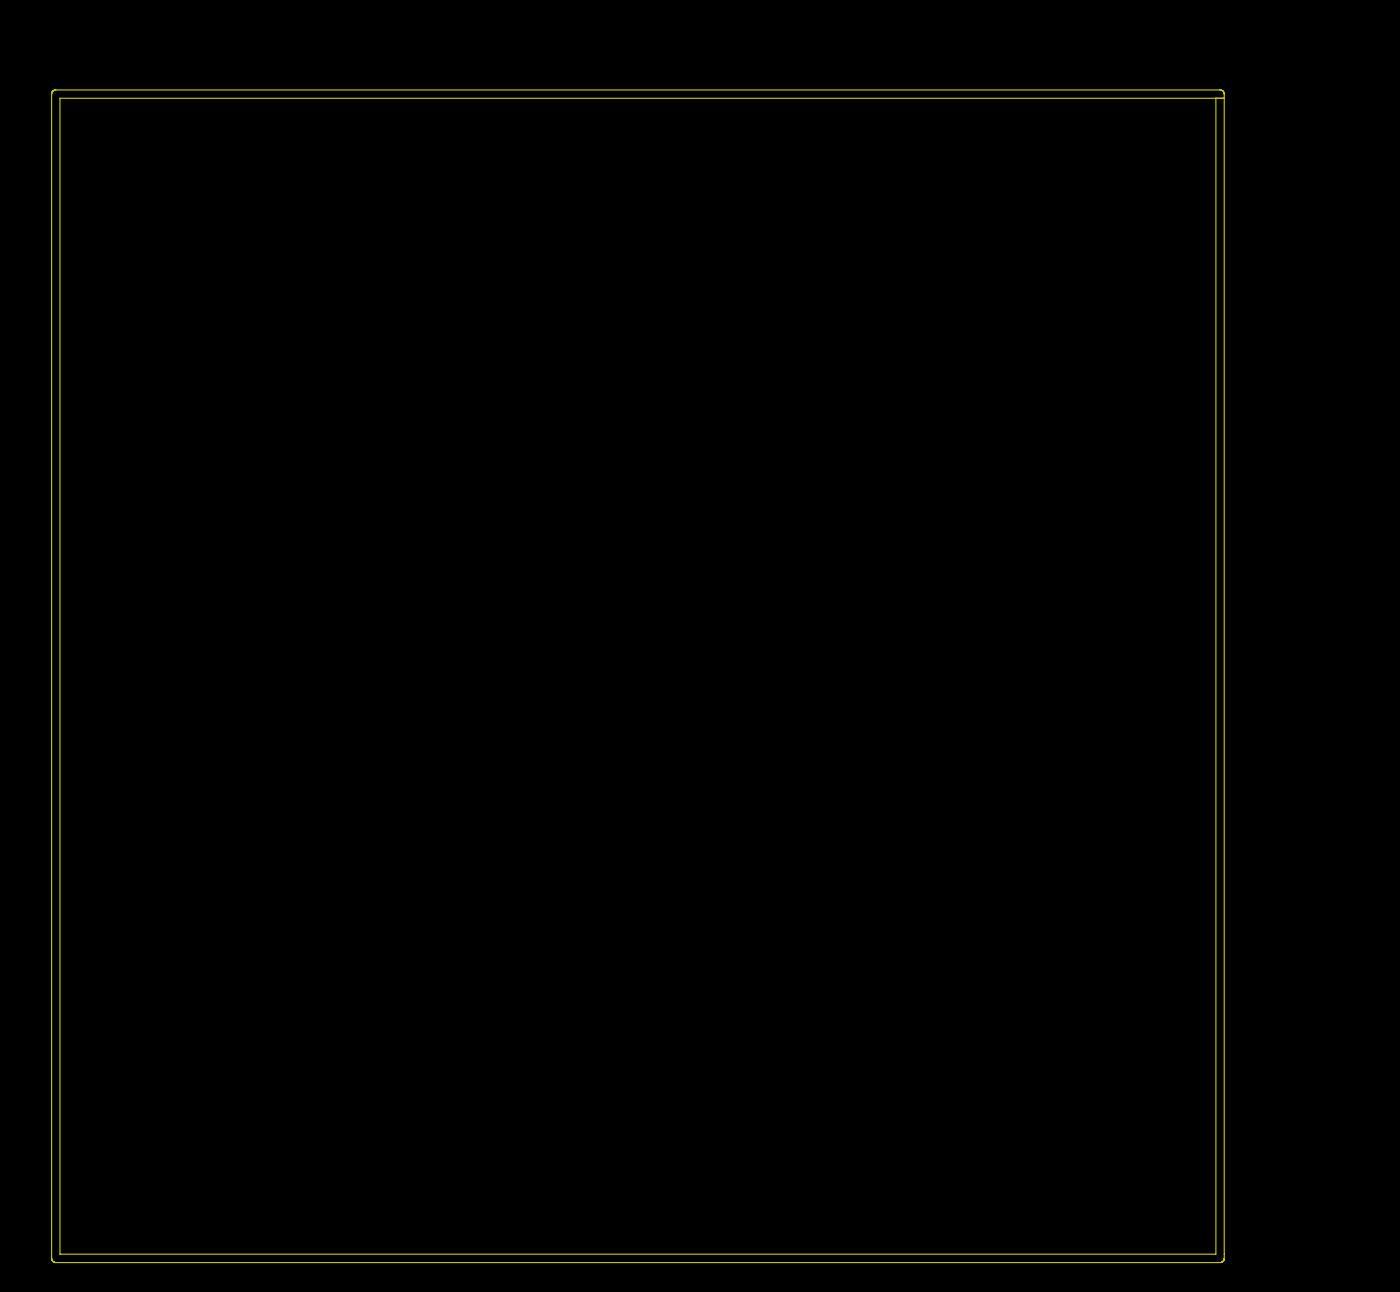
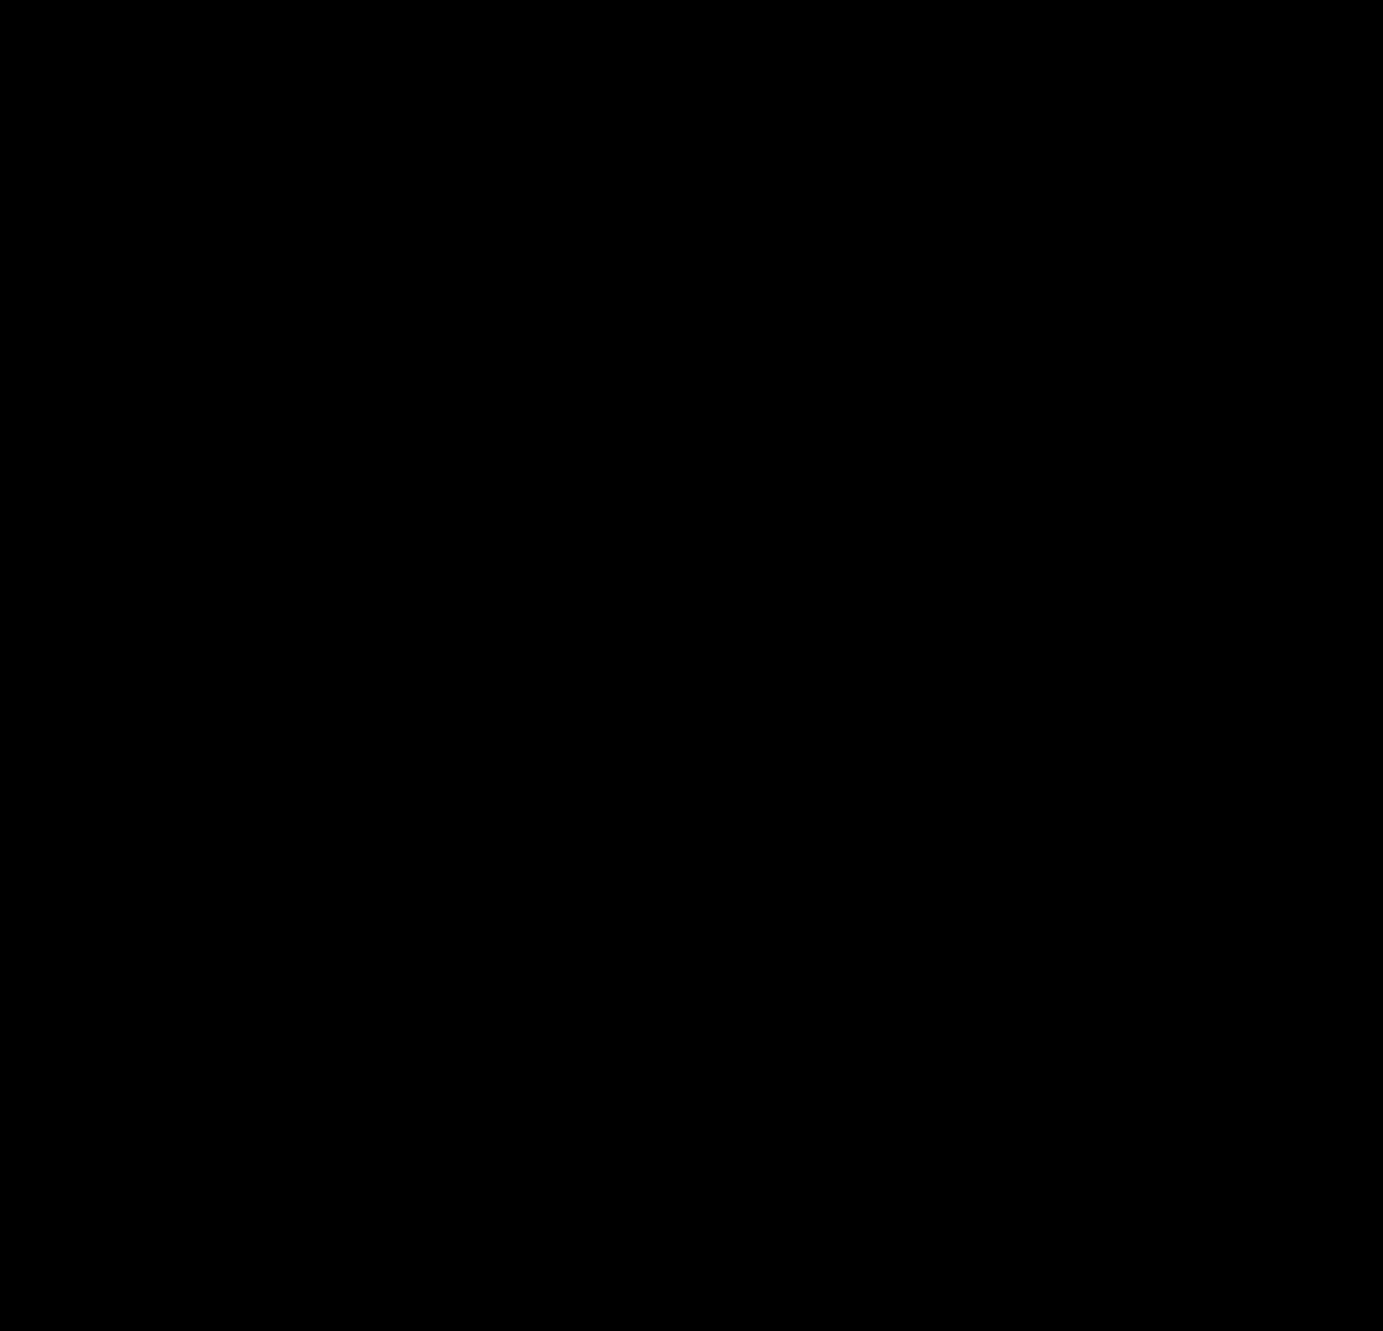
board edge: (55, 89) (1220, 89) -> none
board edge: (51, 93) (51, 1258) -> none
board edge: (1224, 94) (1224, 1258) -> none
board edge: (1215, 98) (1215, 1254) (59, 1254) (59, 98) (1224, 98) -> none
board edge: (55, 1262) (1220, 1262) -> none

